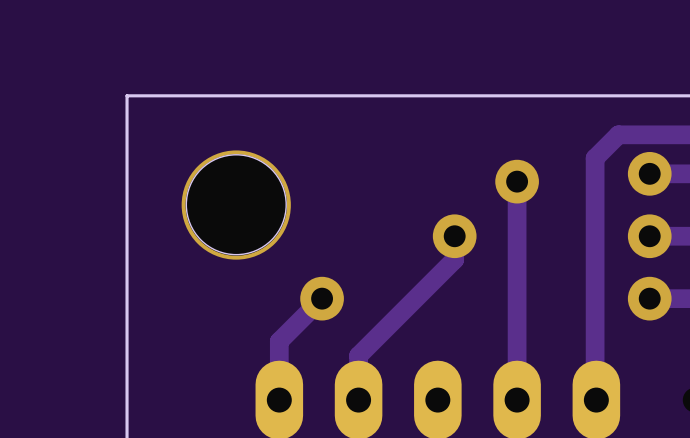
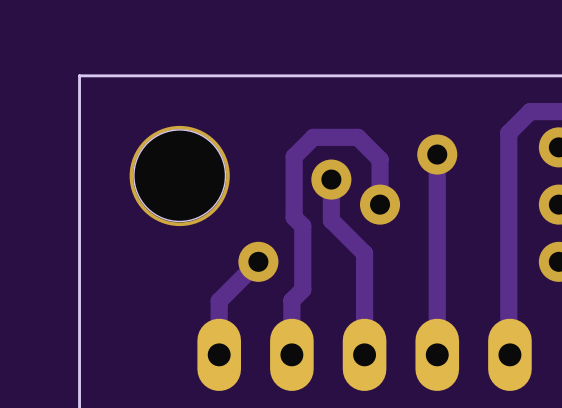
track: none -> (331, 179) (331, 220) (364, 253) (364, 354)
via: none -> (331, 179)
track: (454, 236) (454, 259) (358, 355) -> (380, 204) (380, 159) (357, 137) (313, 137) (294, 156) (294, 217) (302, 226) (302, 289) (291, 300) (291, 314)

